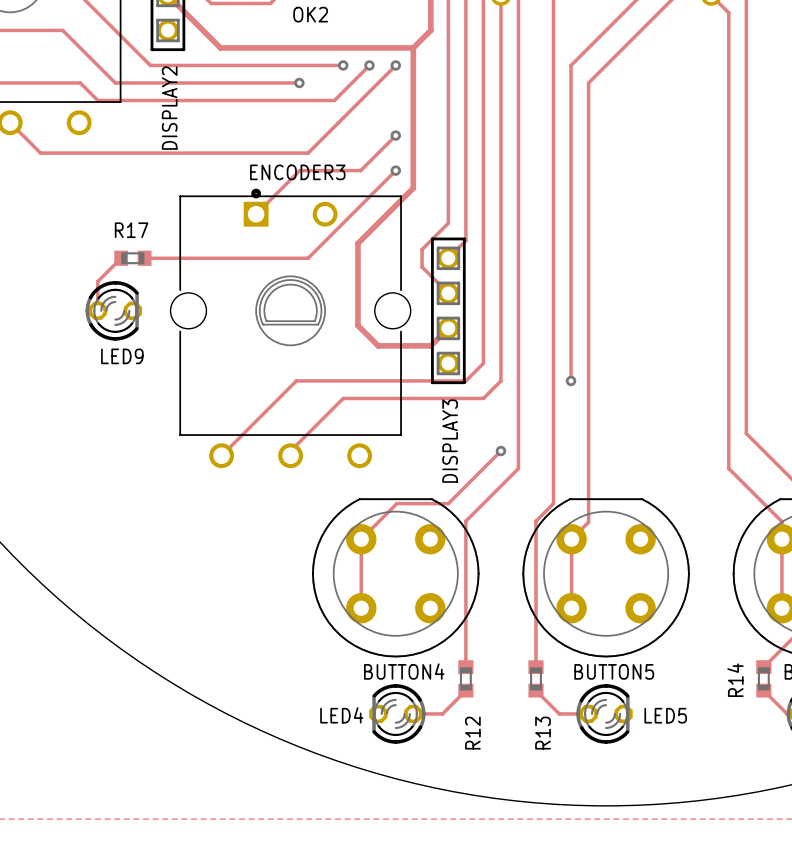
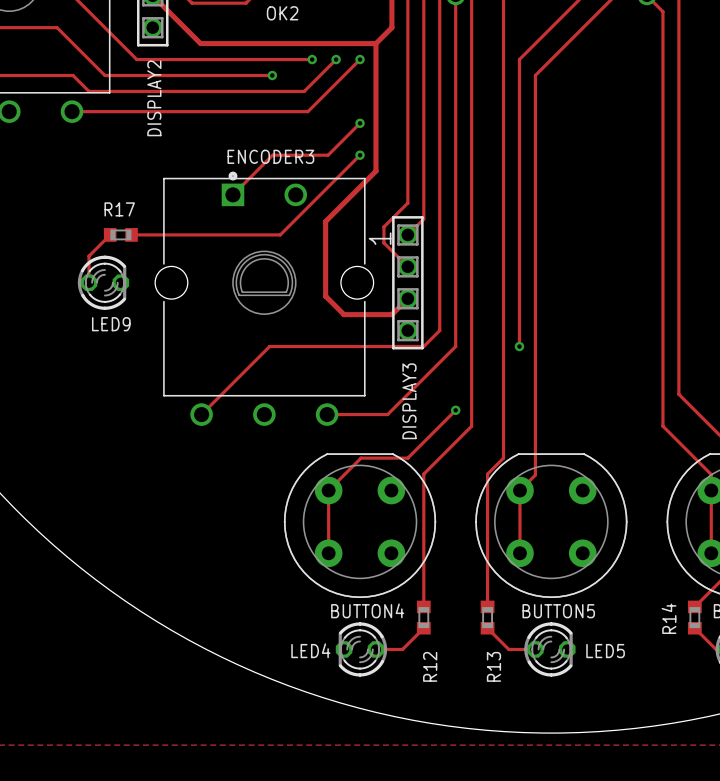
track: (10, 122) (40, 153) (308, 153) (338, 122) -> (72, 111) (307, 111)
DISPLAY3 text: none -> 1 (380, 238)
track: (483, 398) (343, 398) (290, 451) (290, 455) -> (439, 362) (387, 414) (327, 414)

